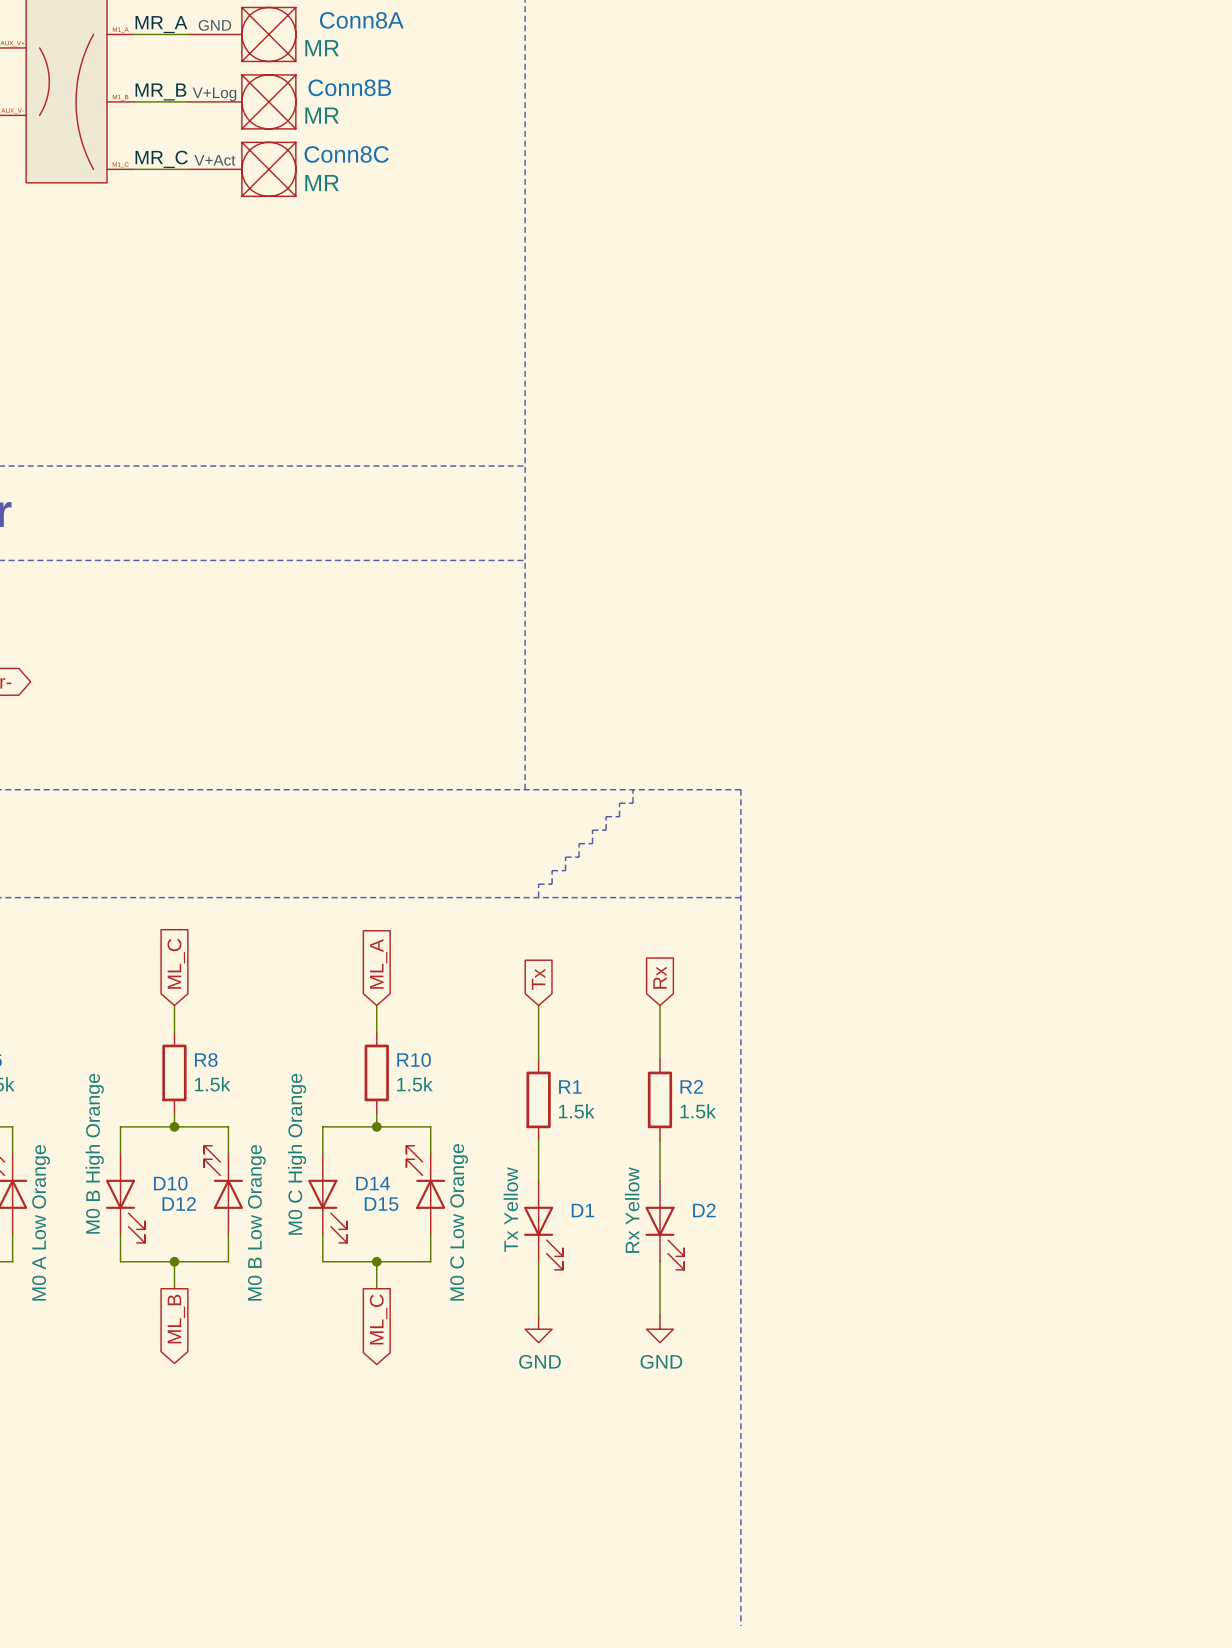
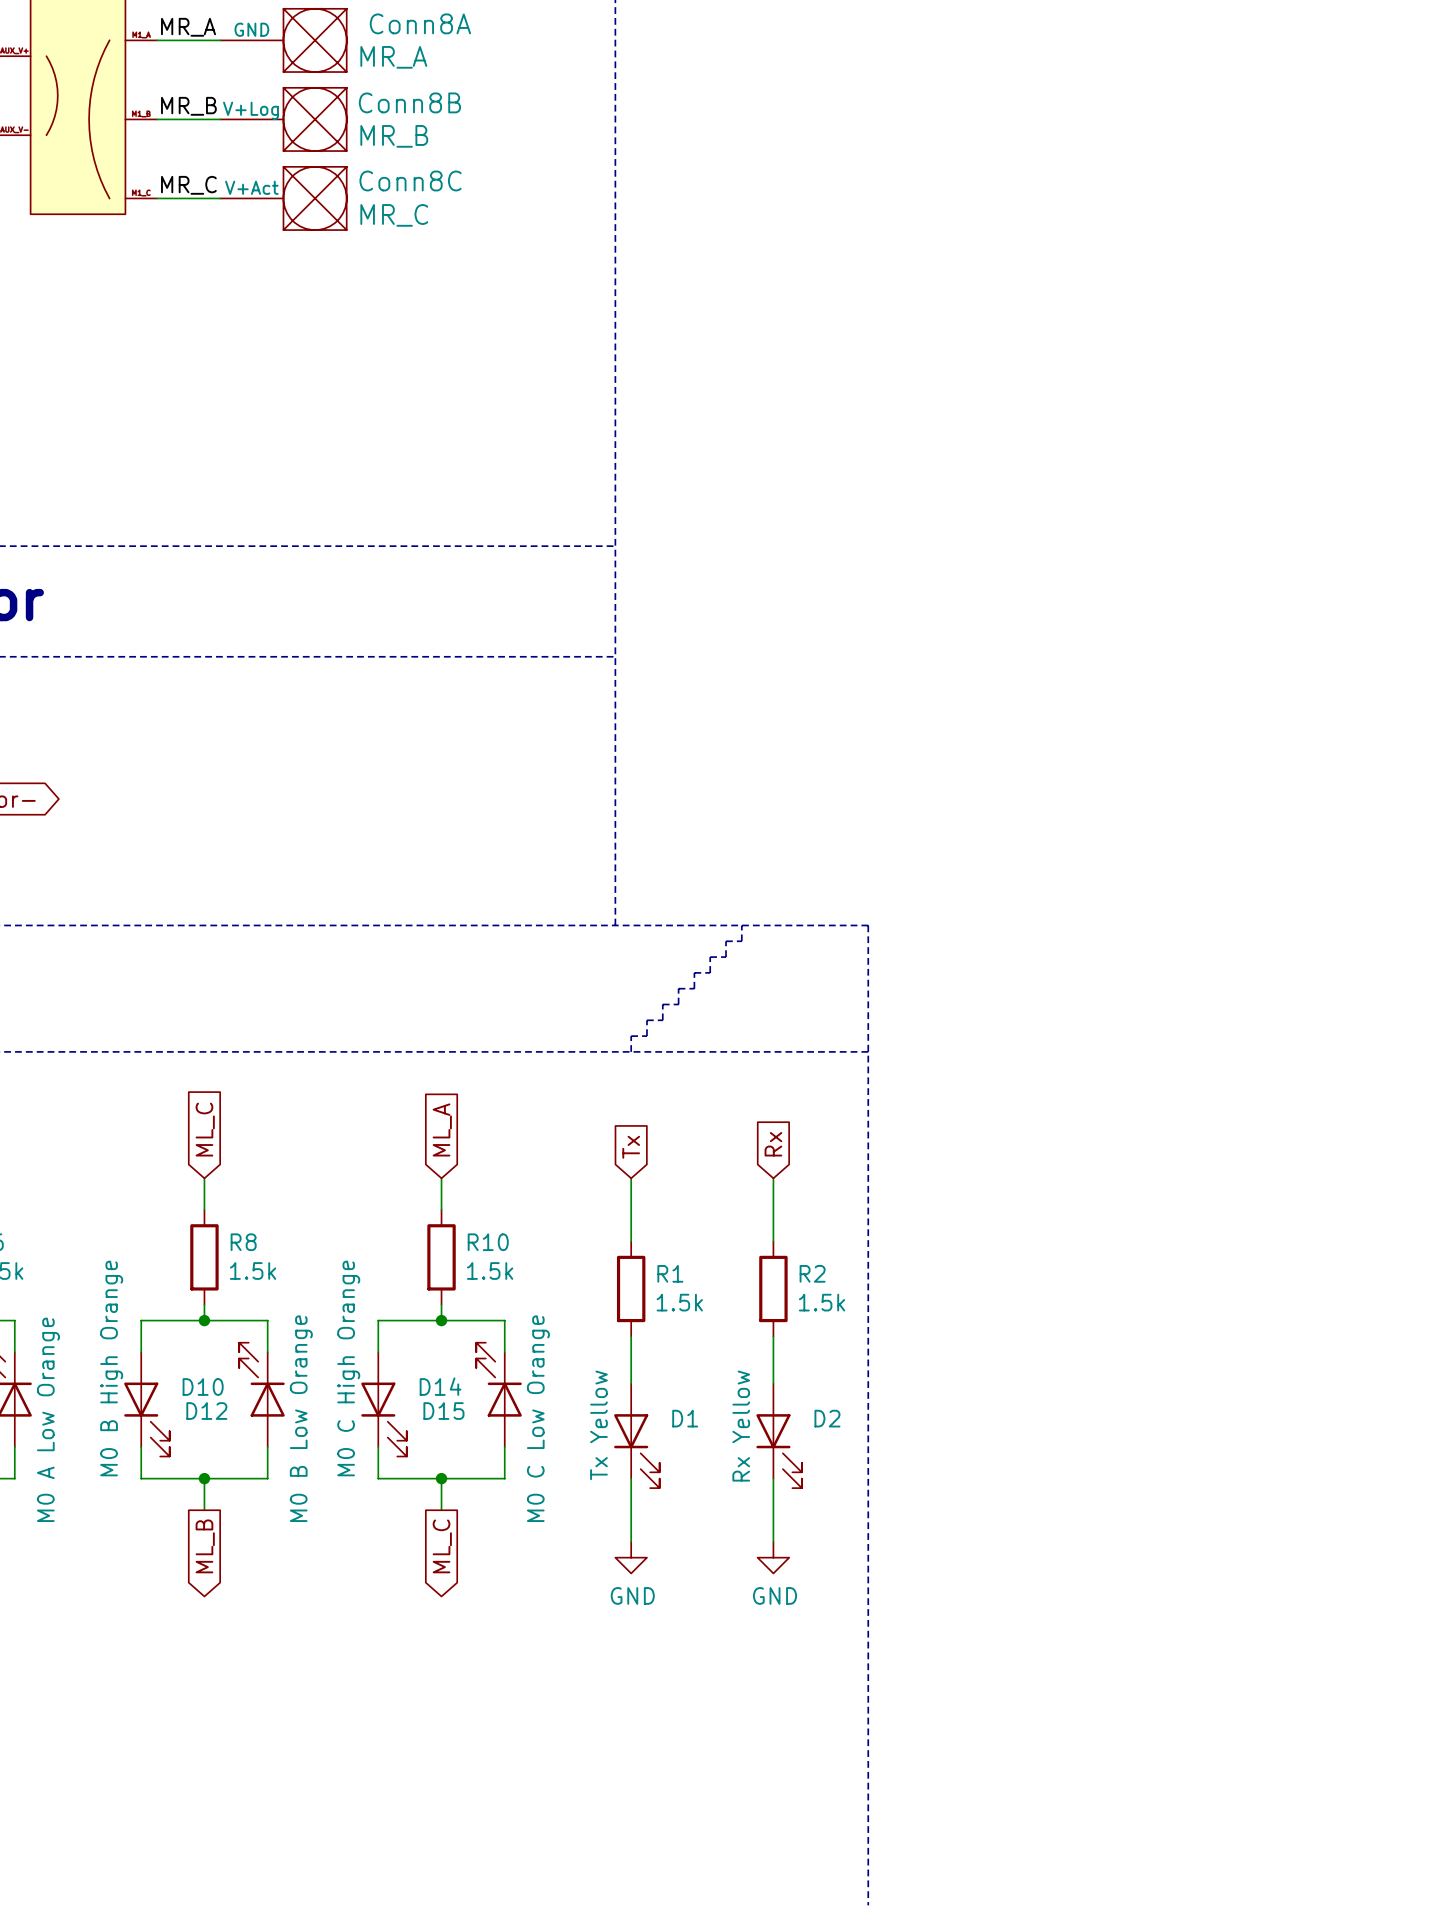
Conn8A value: MR (322, 48) -> MR_A (393, 57)
Conn8B value: MR (322, 115) -> MR_B (394, 136)
Conn8C value: MR (322, 183) -> MR_C (394, 215)

